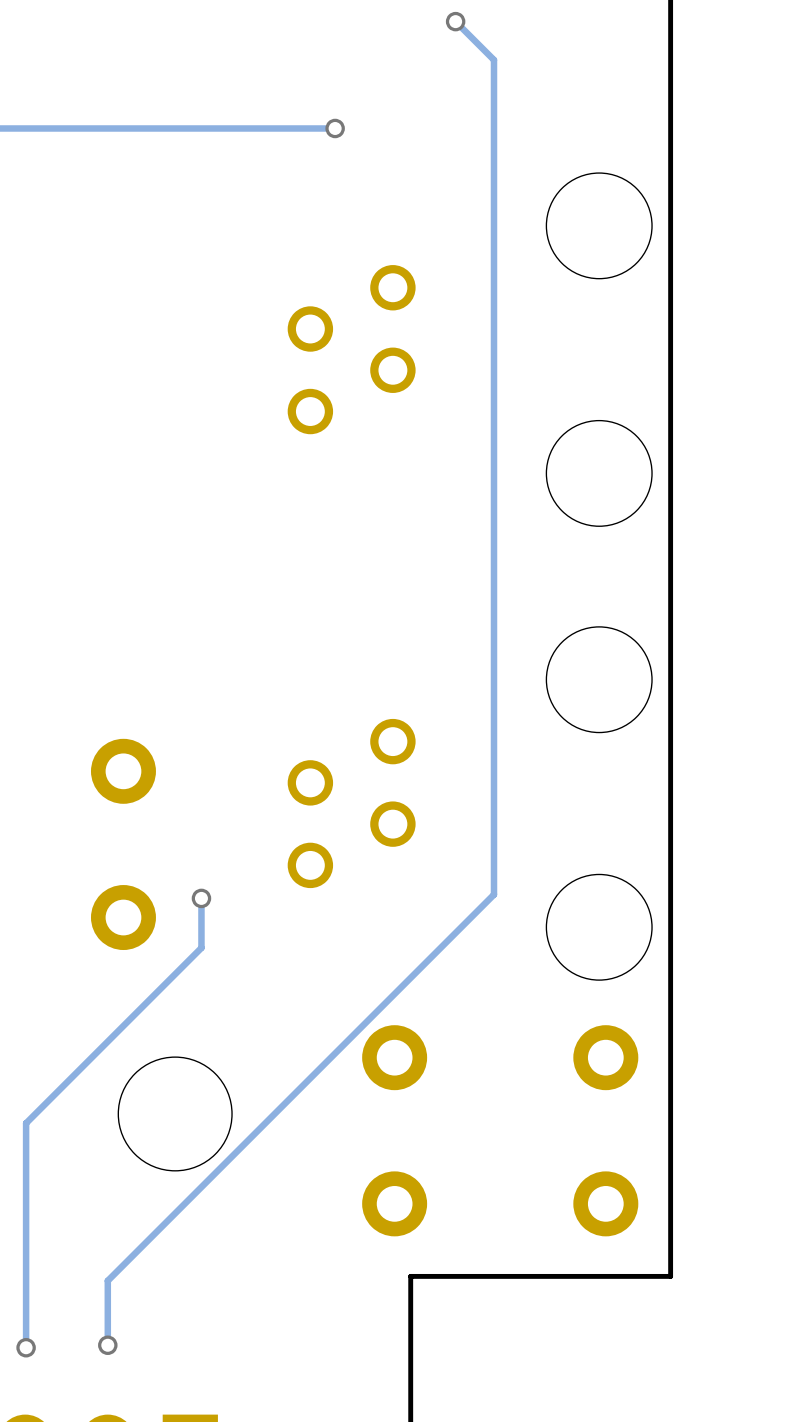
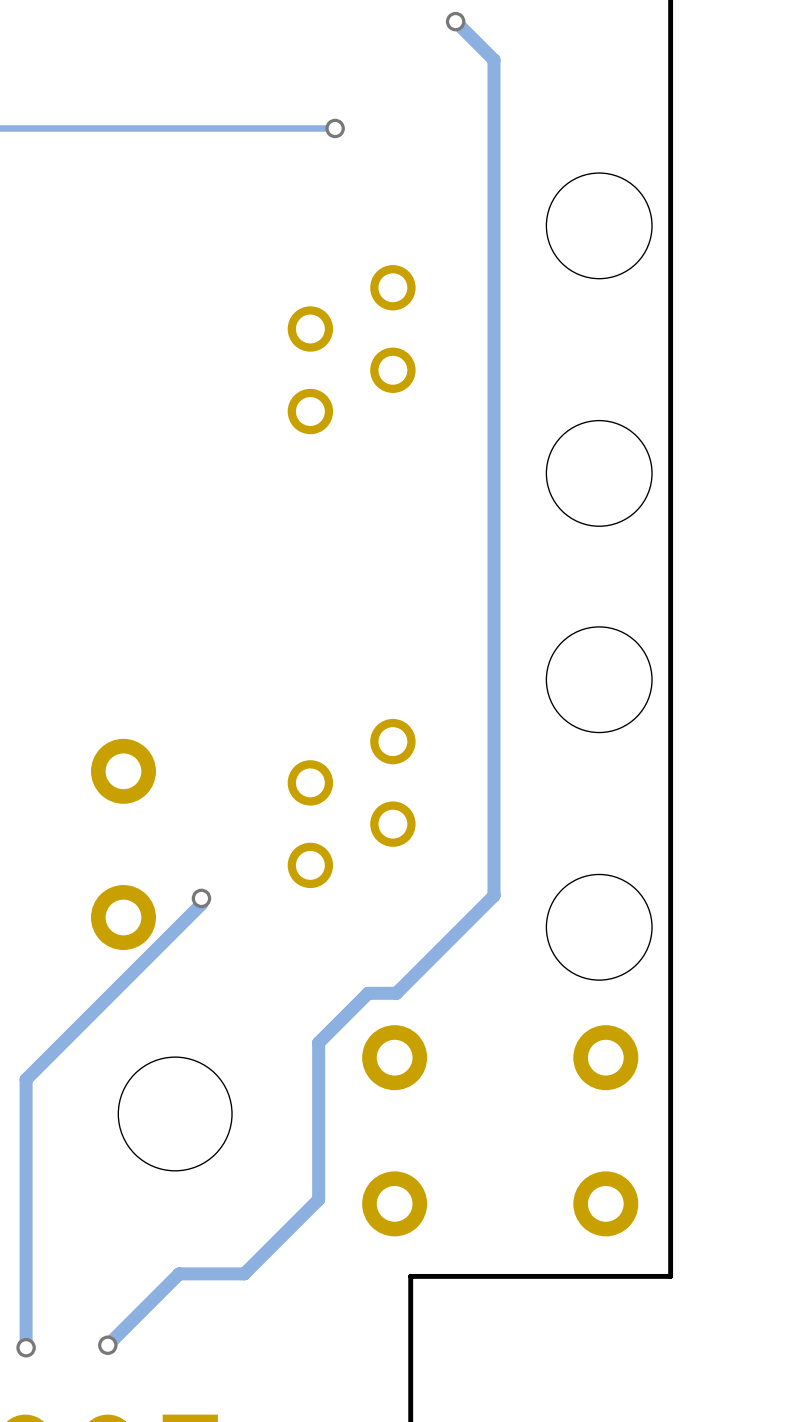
track width: thin (455, 21) (493, 59) (493, 894) -> thick (455, 21) (493, 59) (493, 894)
track: (493, 894) (107, 1280) (107, 1345) -> (493, 894) (396, 993) (368, 993) (318, 1042) (318, 1199) (244, 1273) (179, 1273) (107, 1345)
track: (201, 904) (201, 947) (26, 1123) -> (201, 904) (26, 1079) (26, 1123)
track width: thin (26, 1123) (26, 1347) -> thick (26, 1123) (26, 1347)

